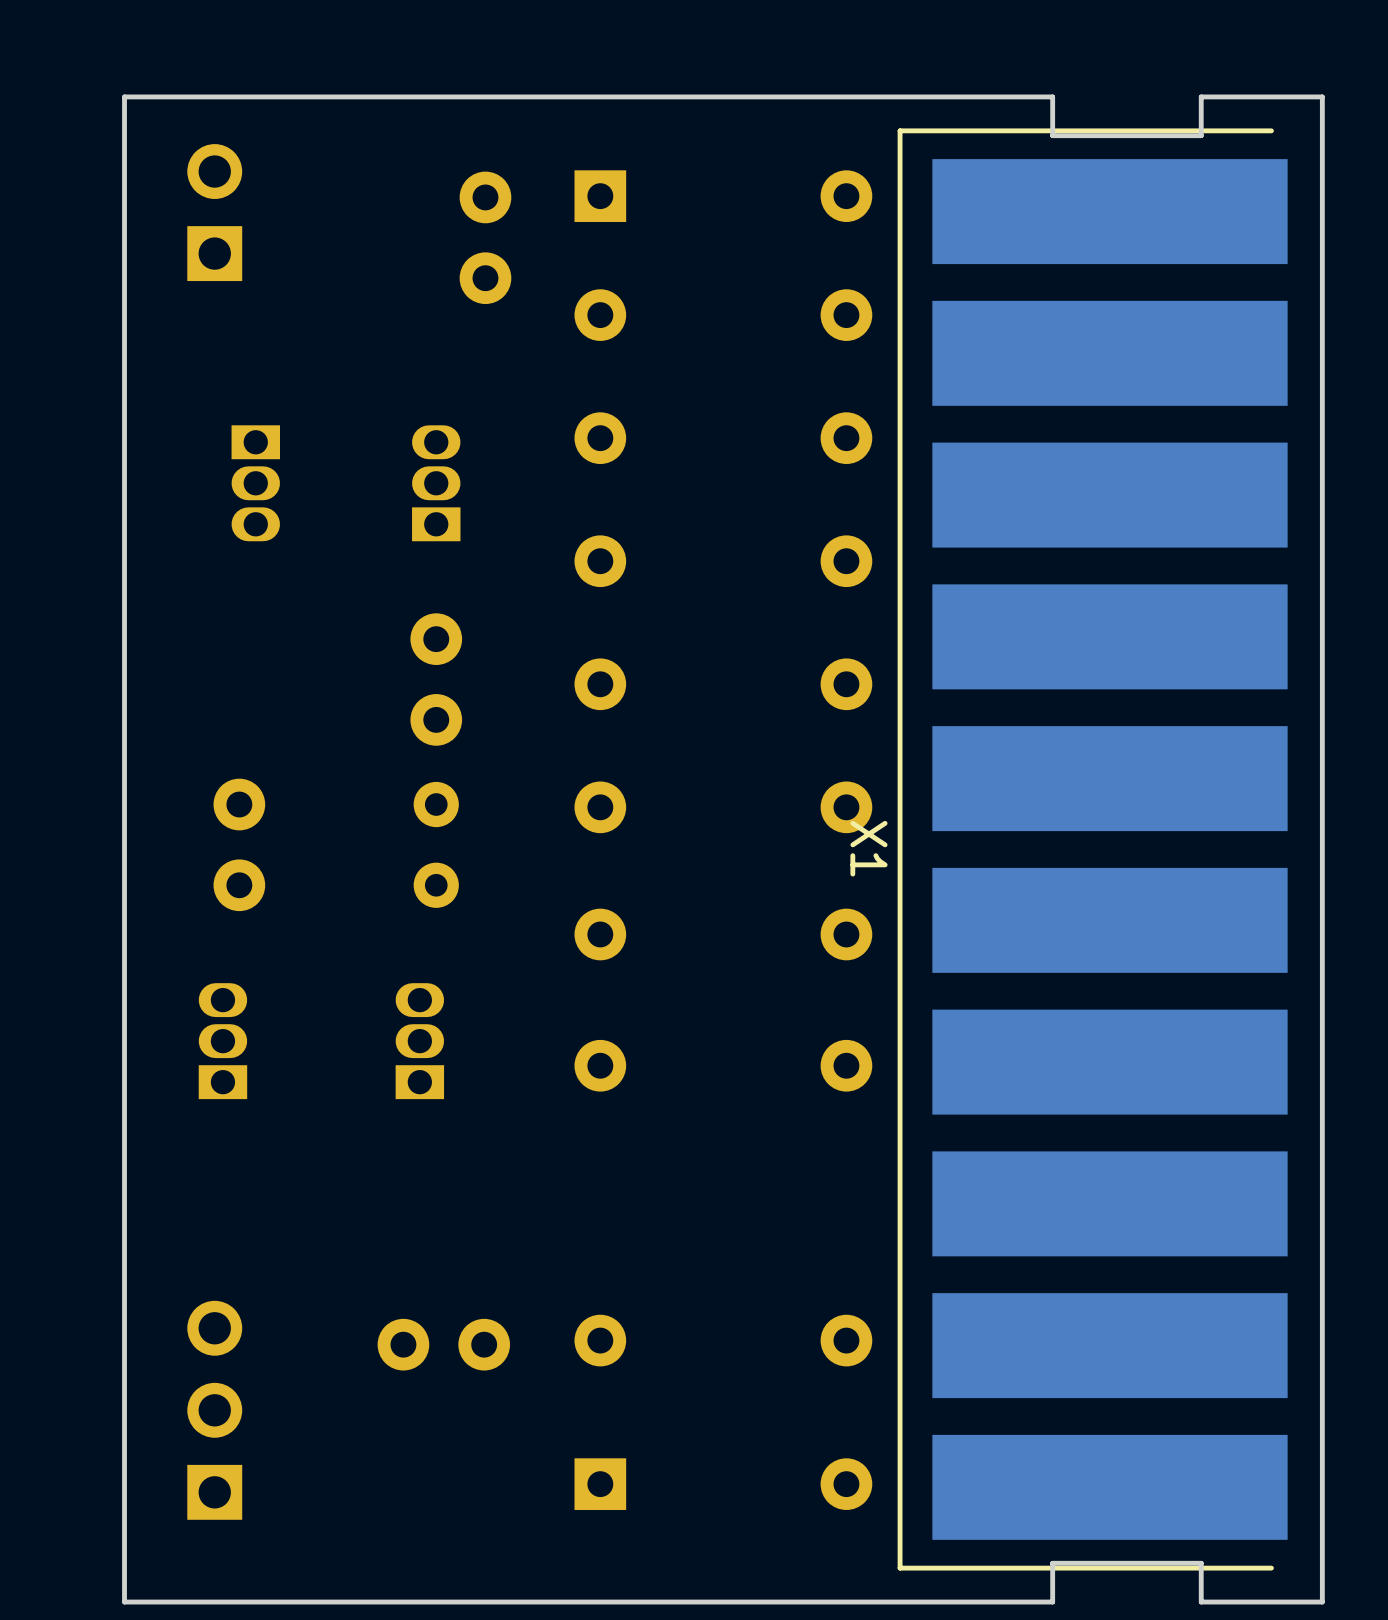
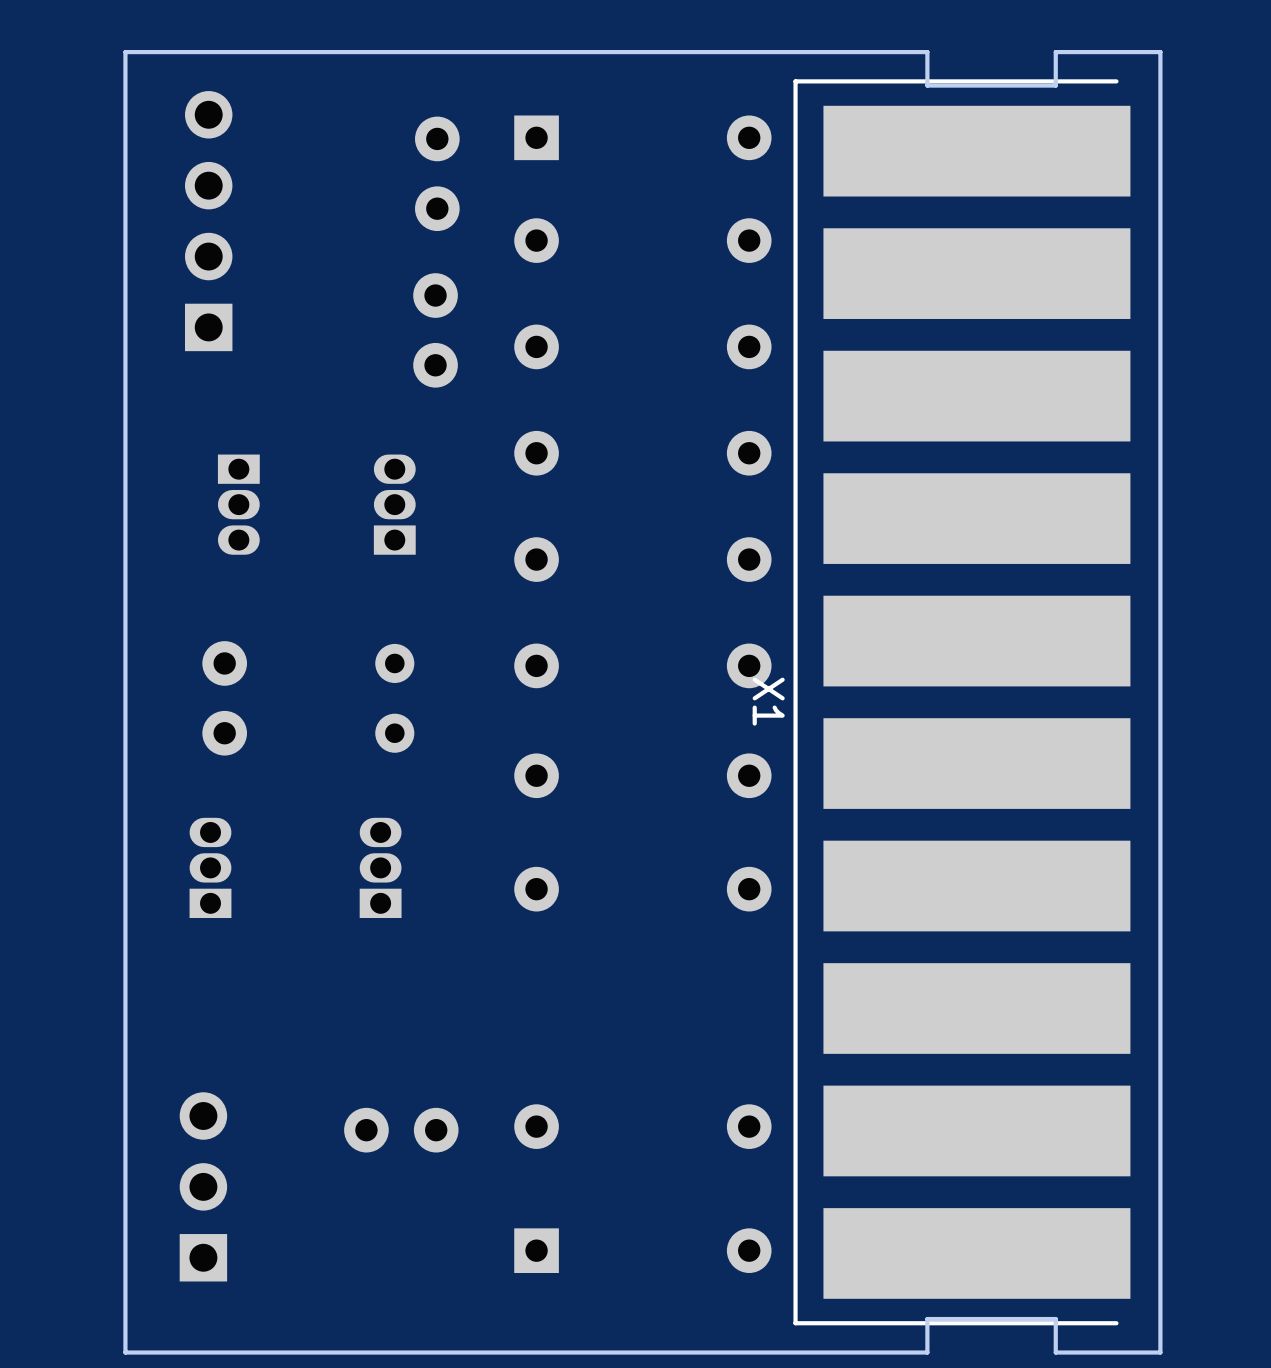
part: (214, 212) -> none
part: none -> (208, 221)
part: (255, 483) -> none
part: (436, 483) -> none
part: none -> (238, 504)
part: none -> (394, 504)
part position: (436, 679) -> (435, 330)

